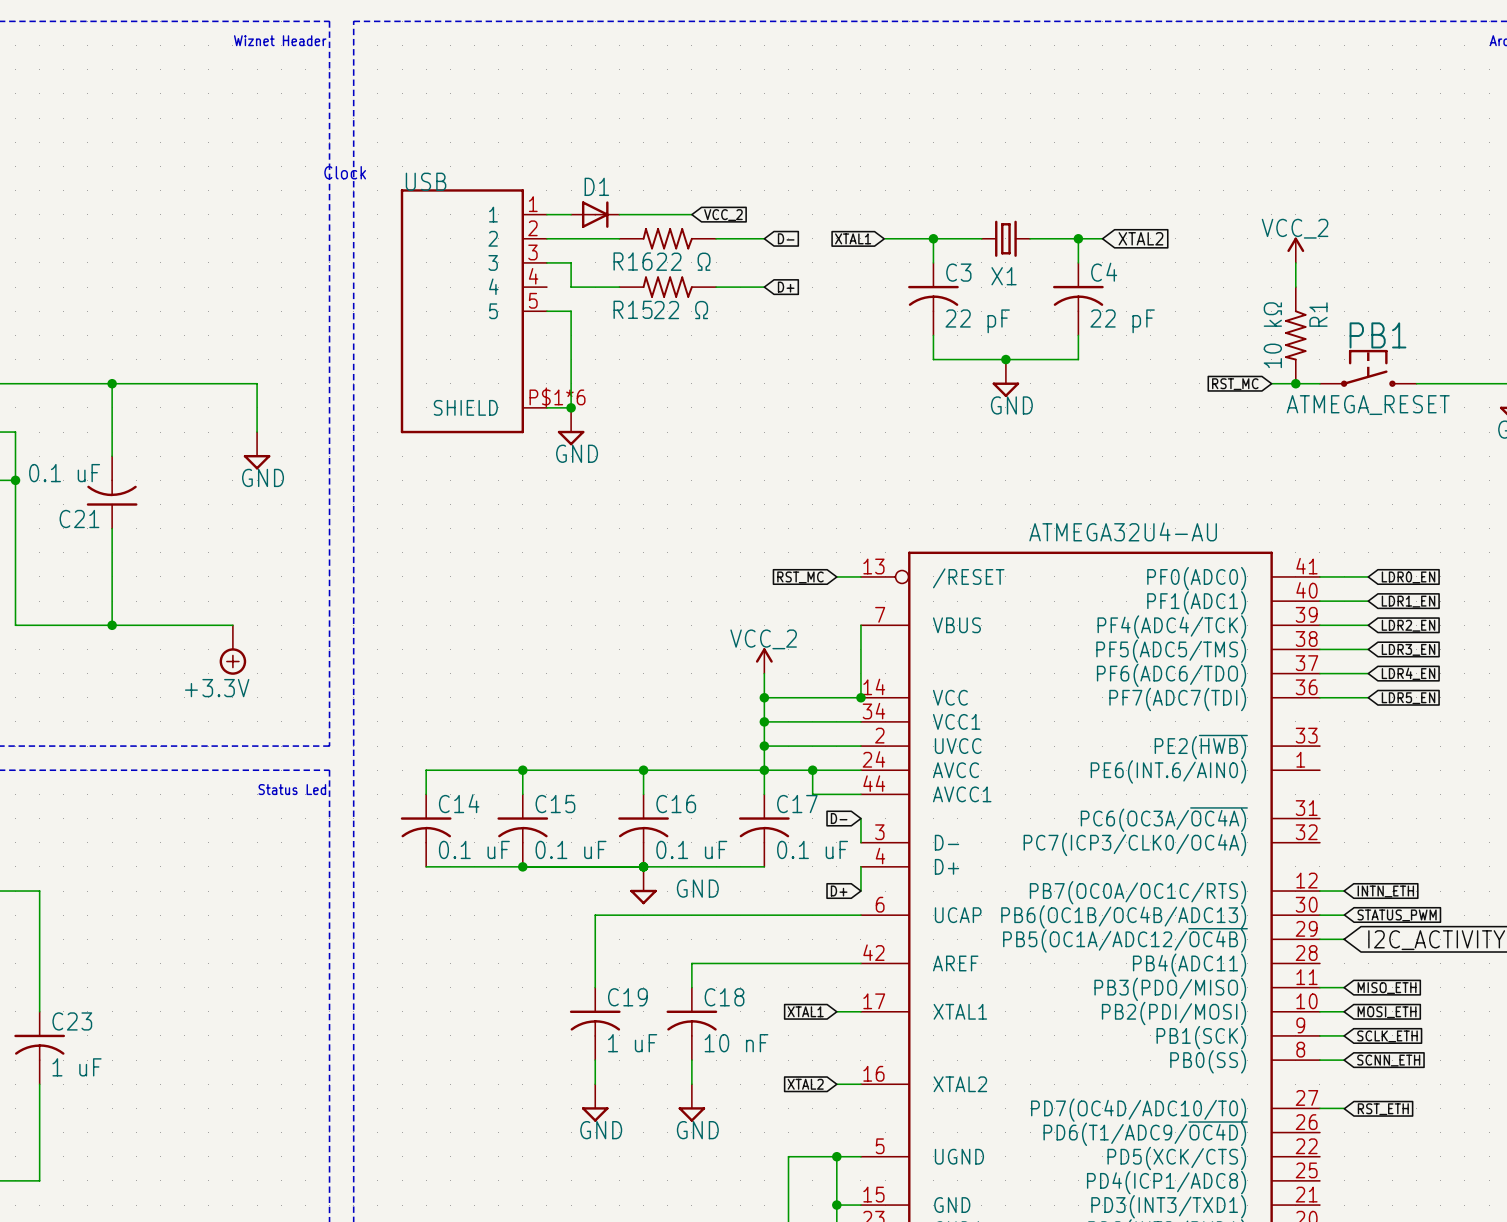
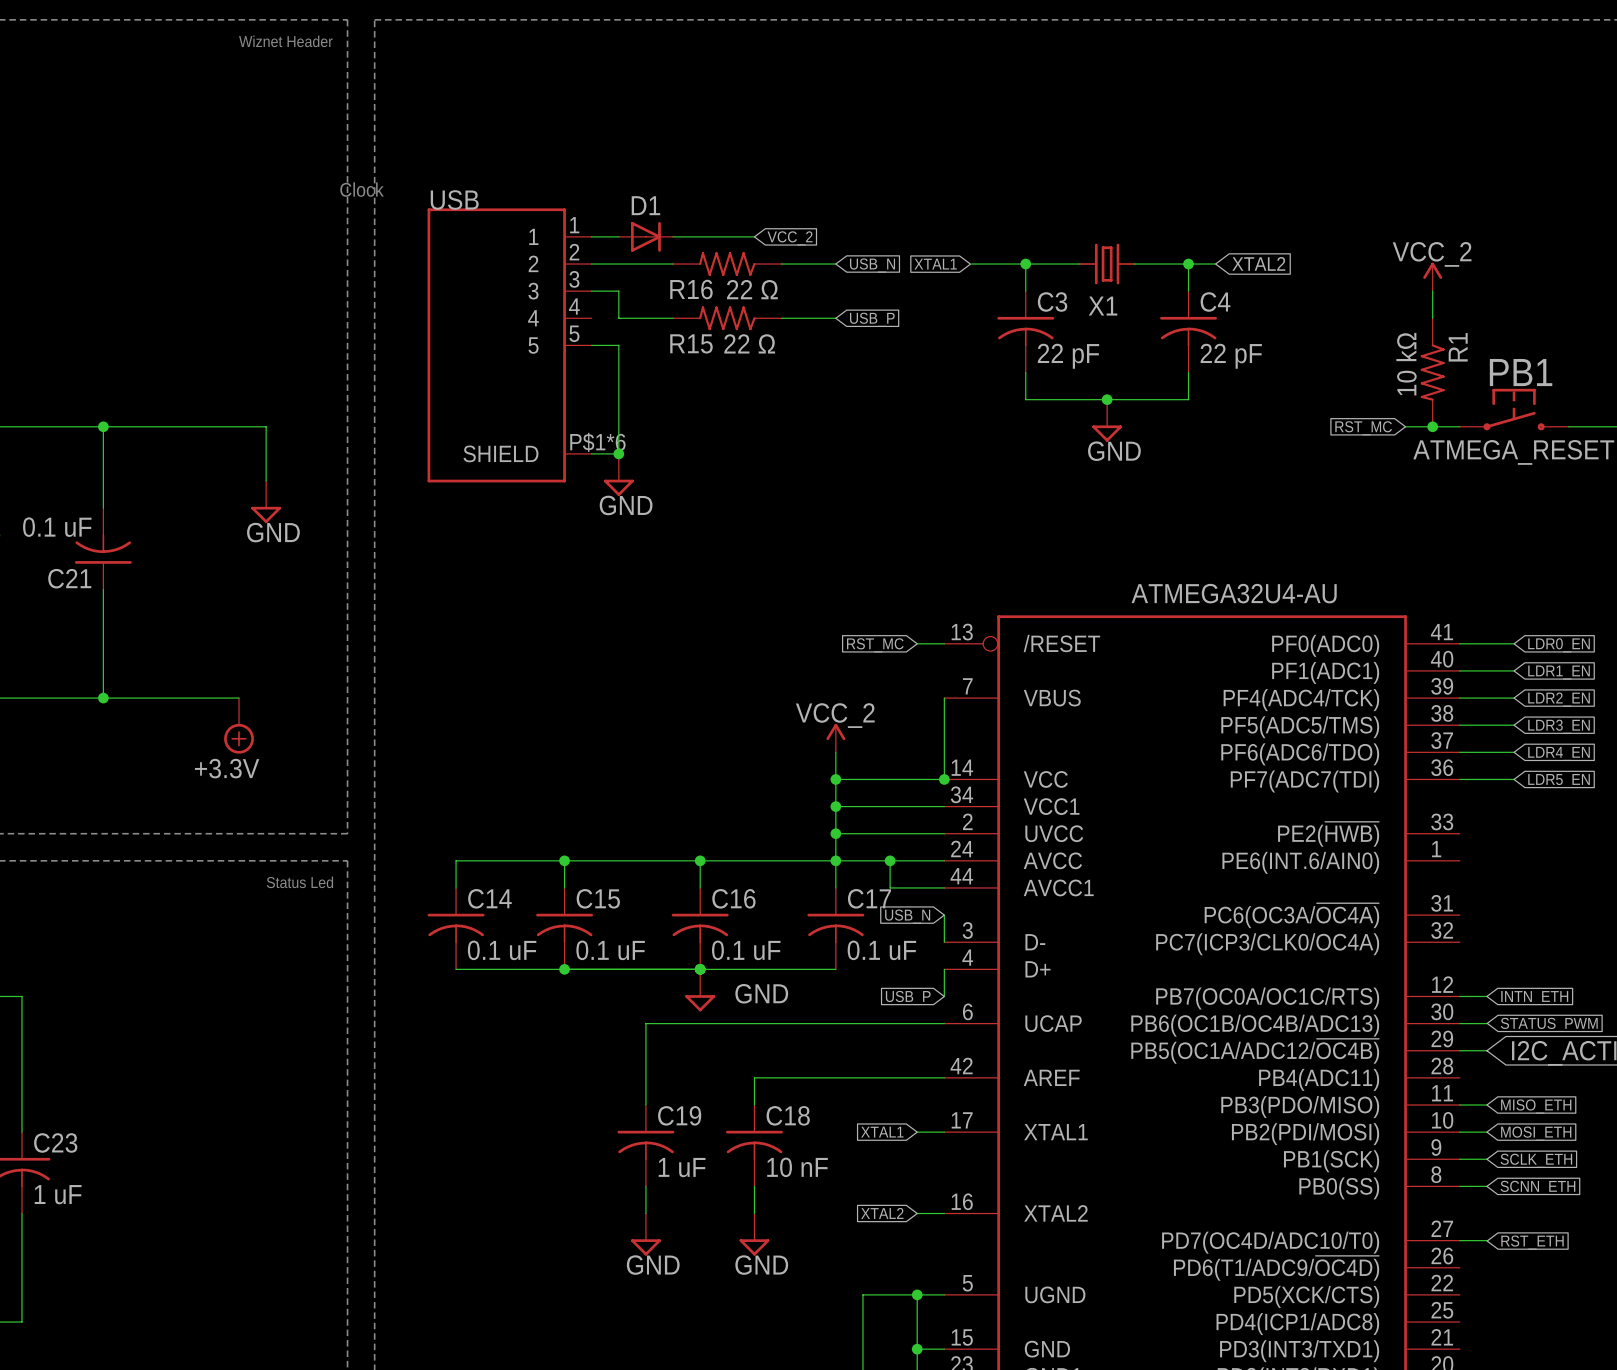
global label: D- (786, 238) -> USB_N (872, 265)
global label: D+ (786, 287) -> USB_P (872, 319)
global label: D- (839, 818) -> USB_N (907, 916)
global label: D+ (839, 891) -> USB_P (908, 997)

